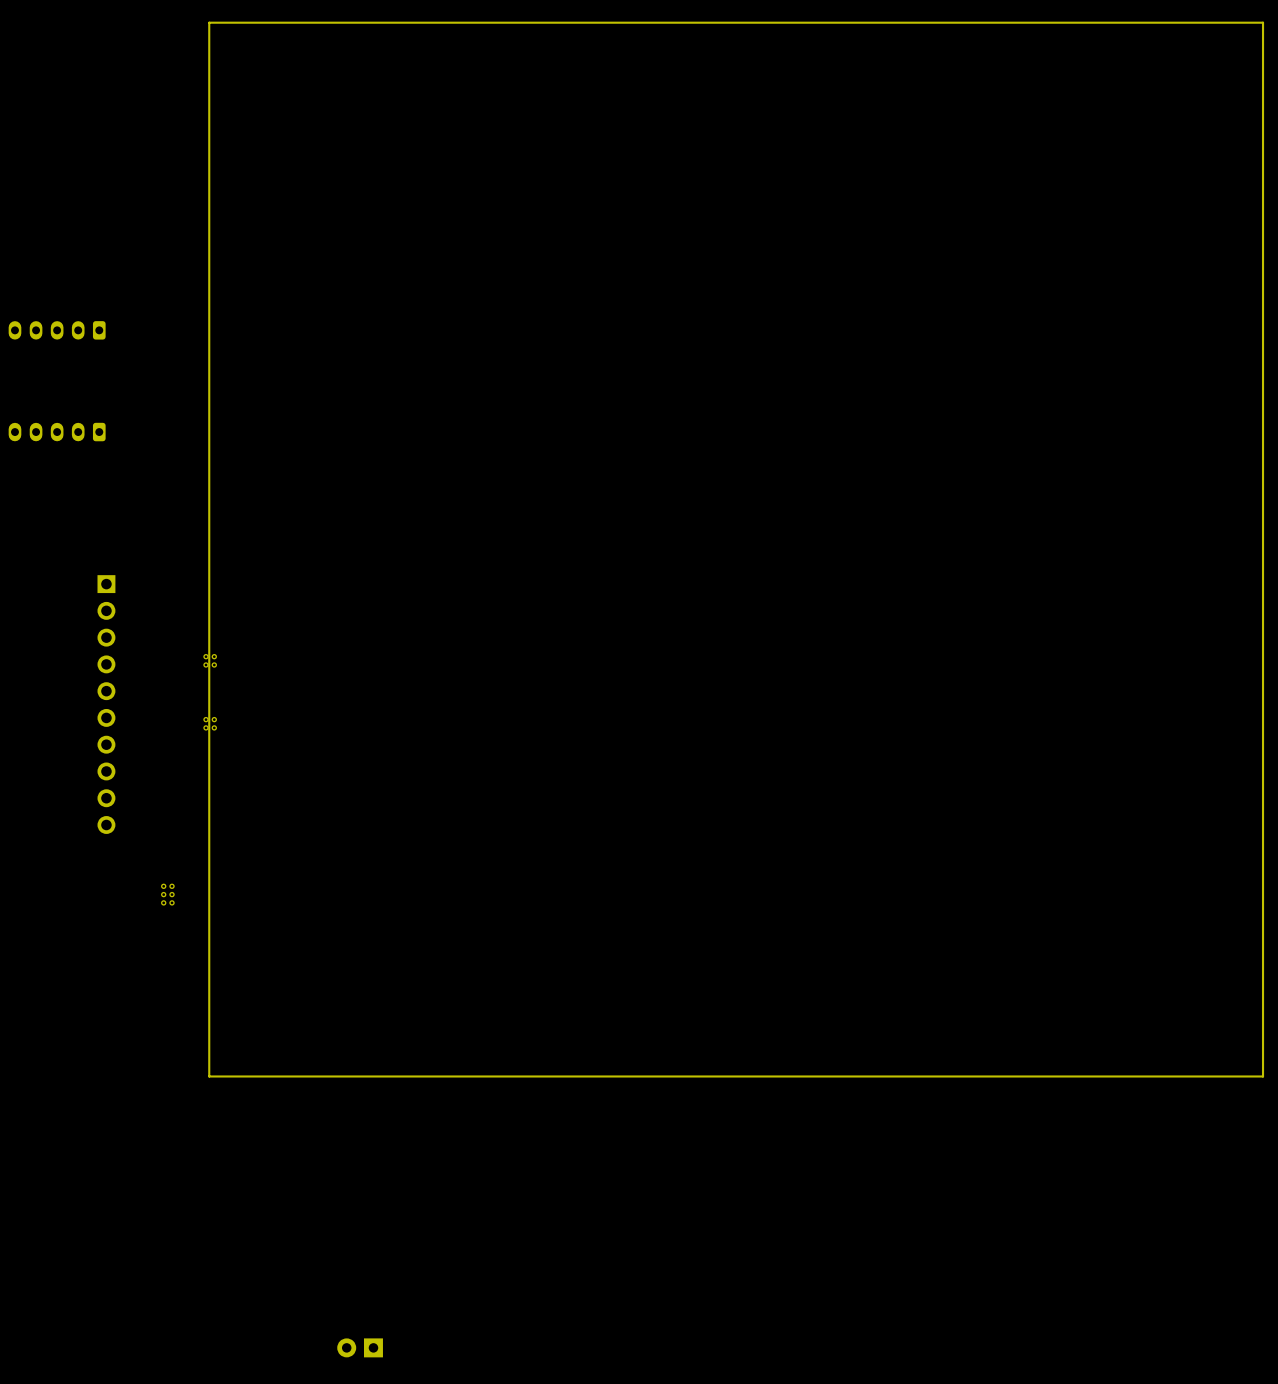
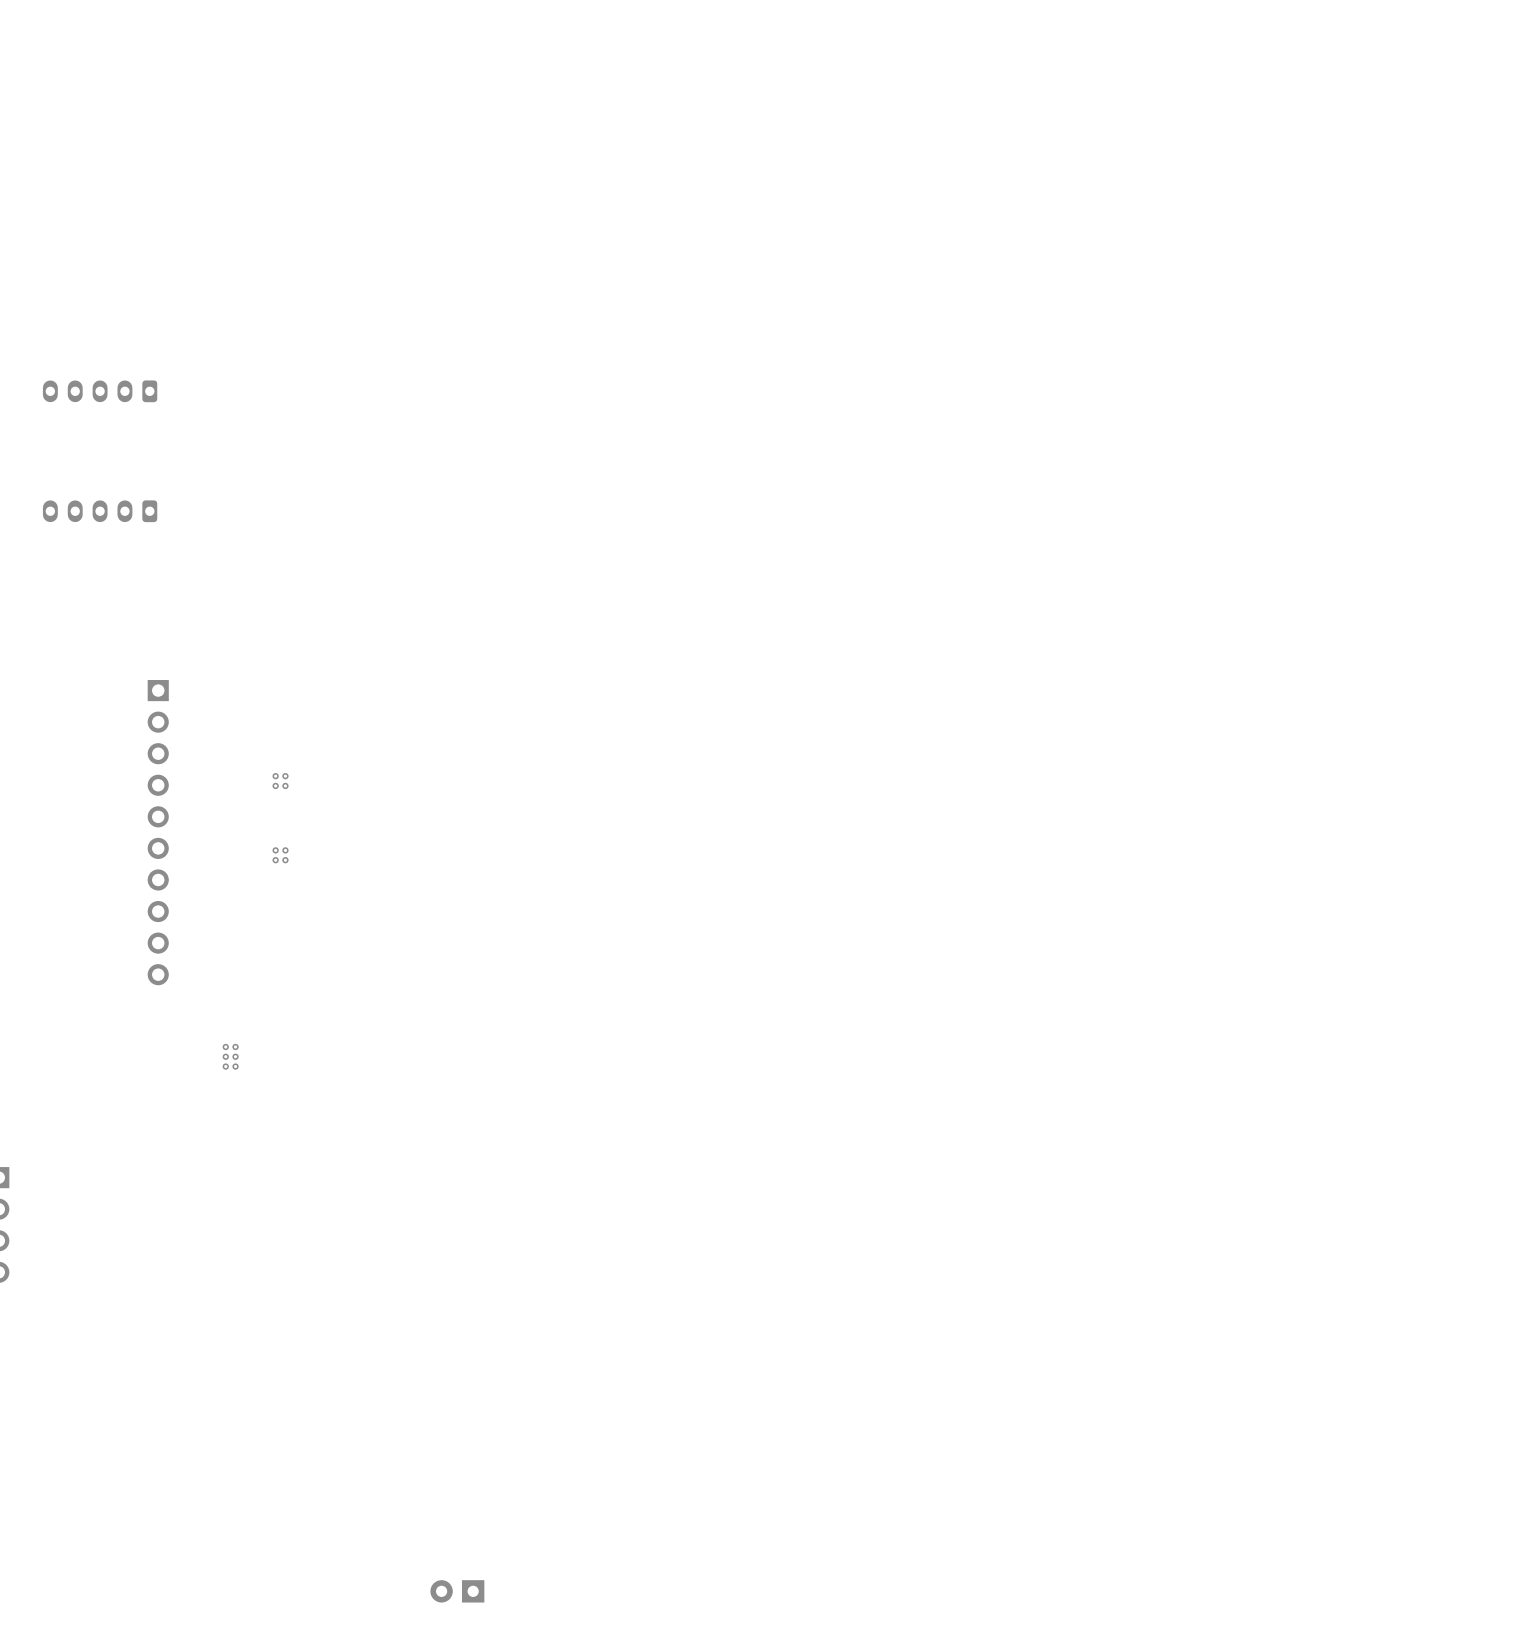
board edge: (1263, 22) (209, 22) (209, 1076) (1263, 1076) (1263, 22) -> none

